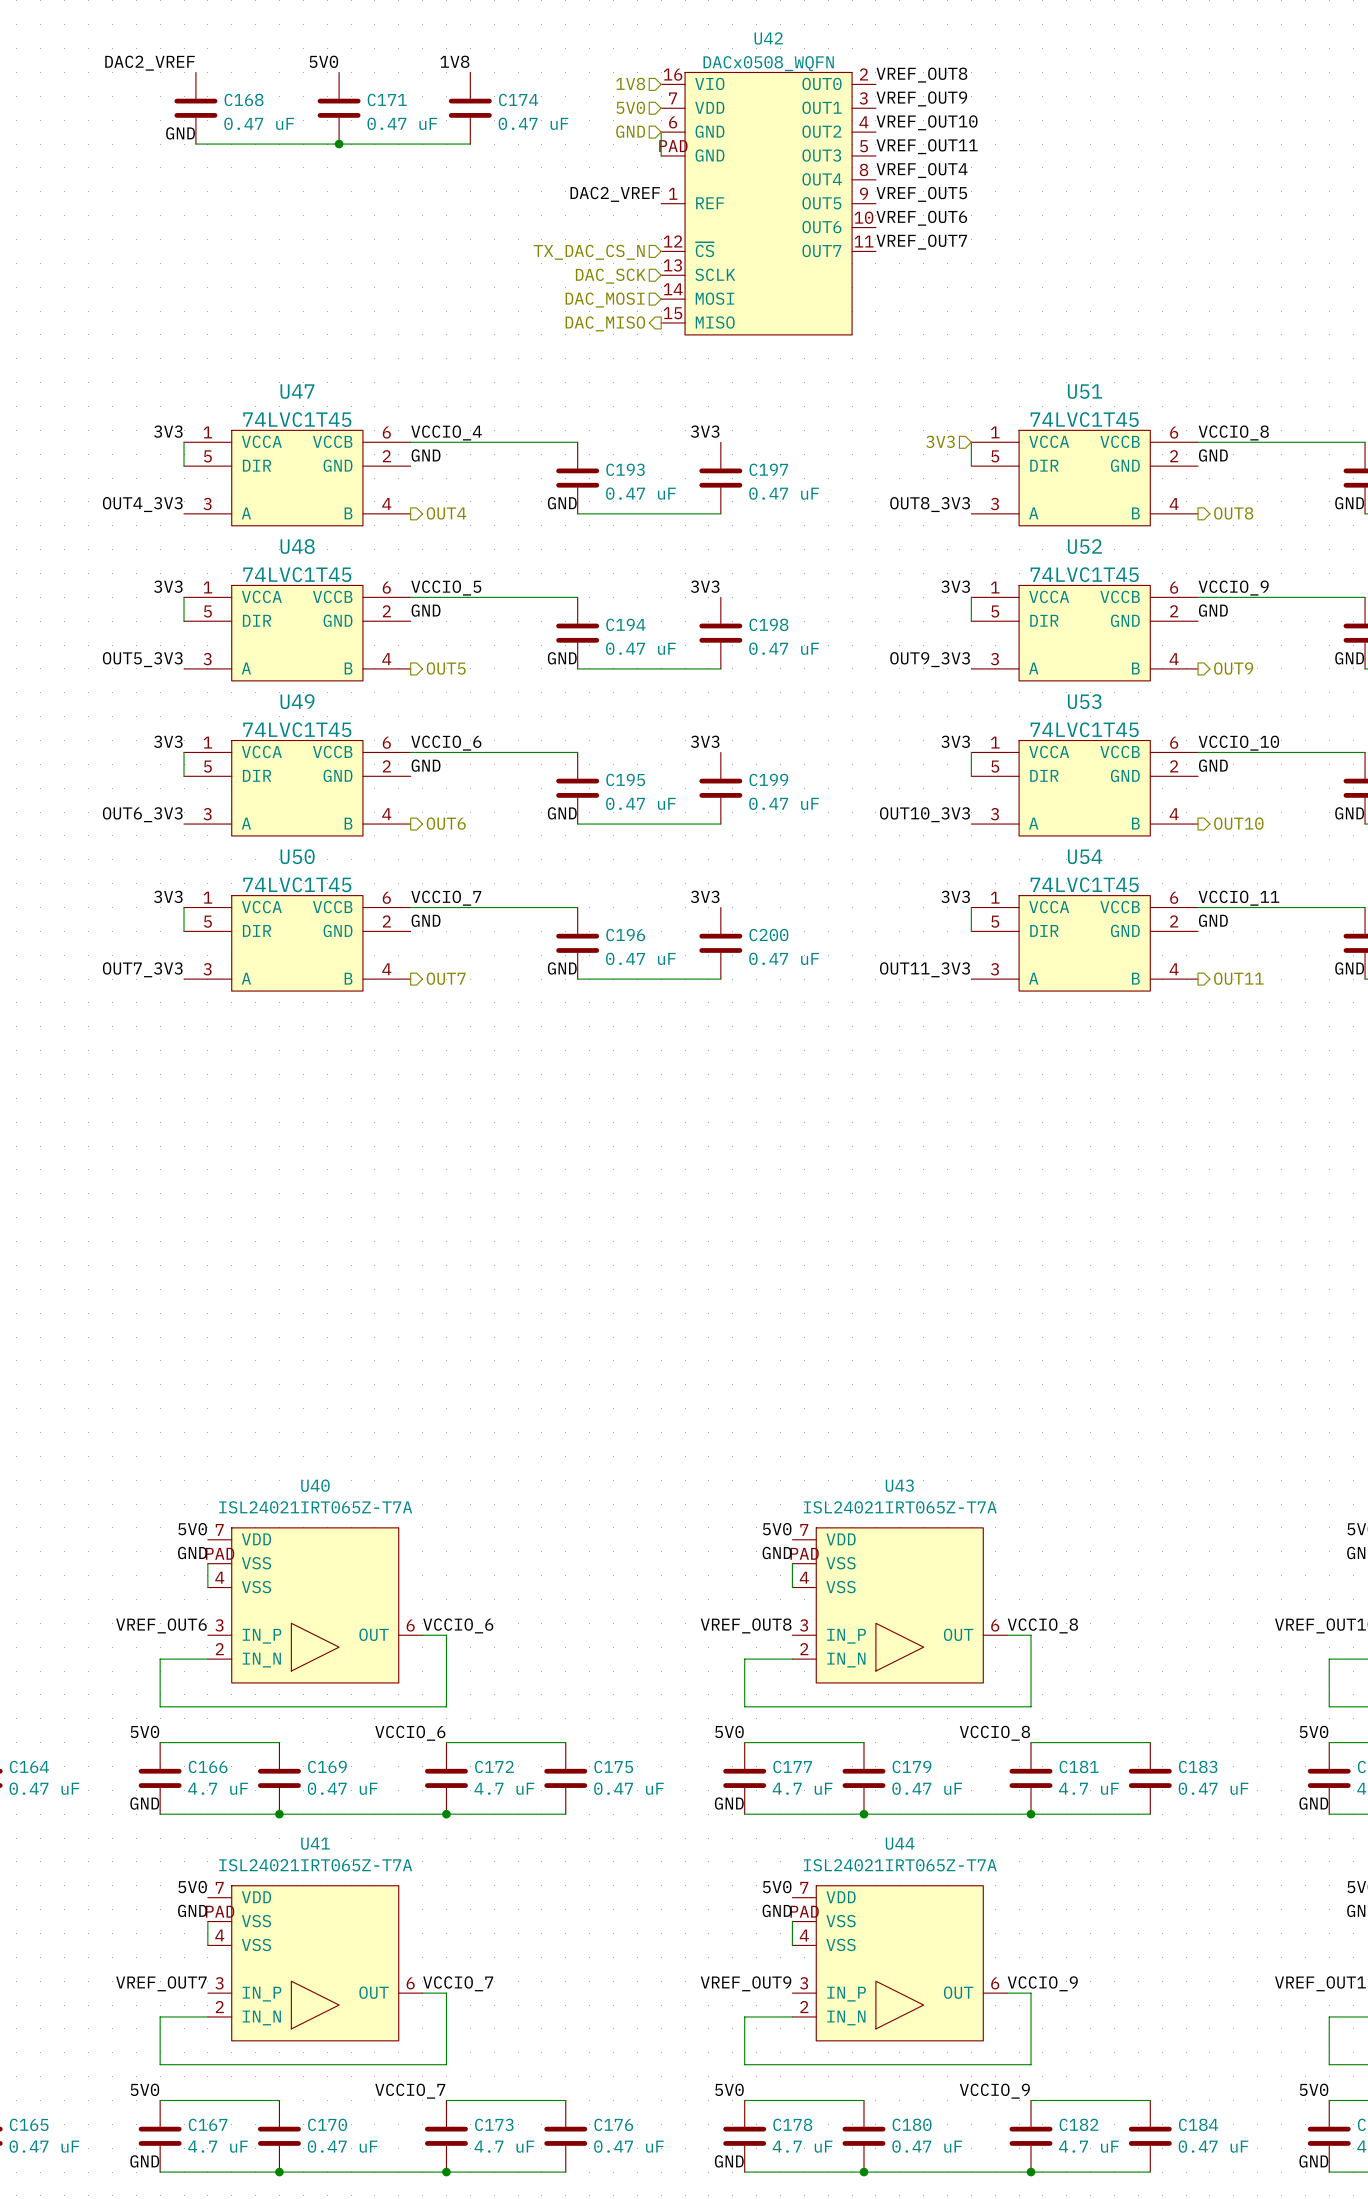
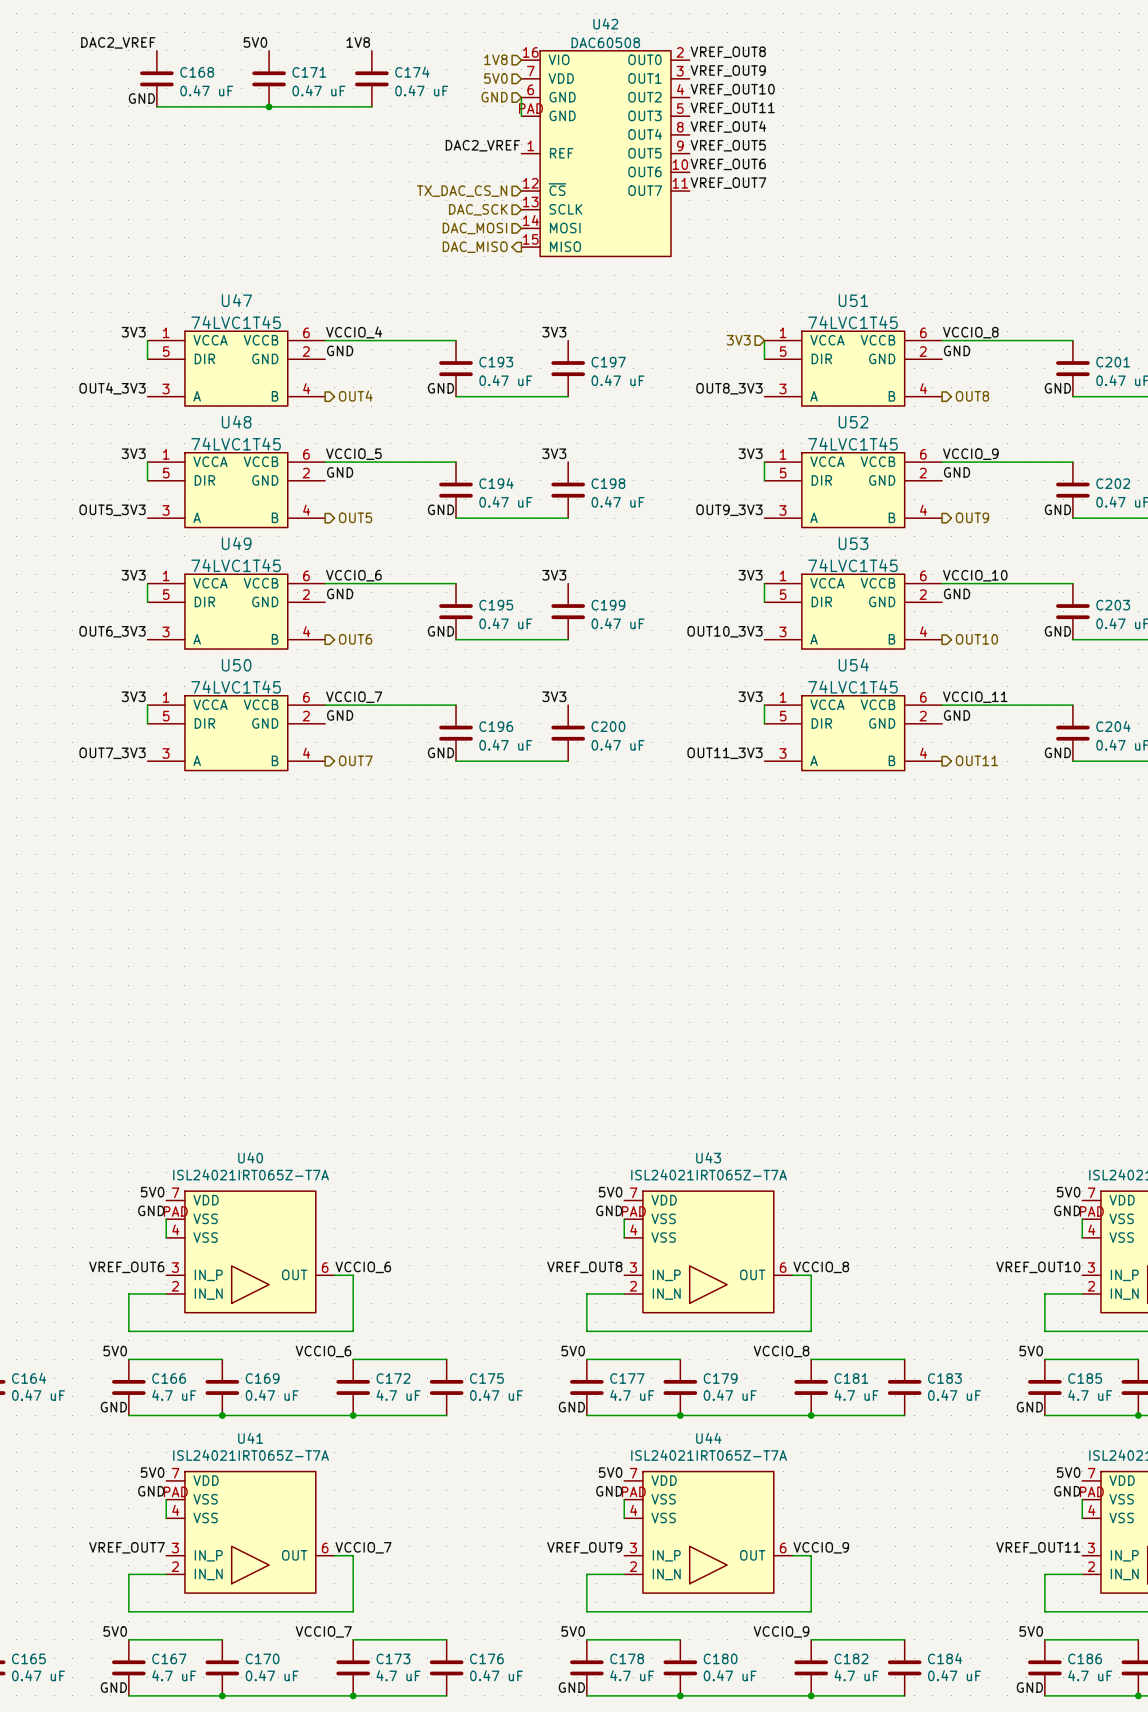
U42 value: DACx0508_WQFN (768, 63) -> DAC60508 (605, 42)

